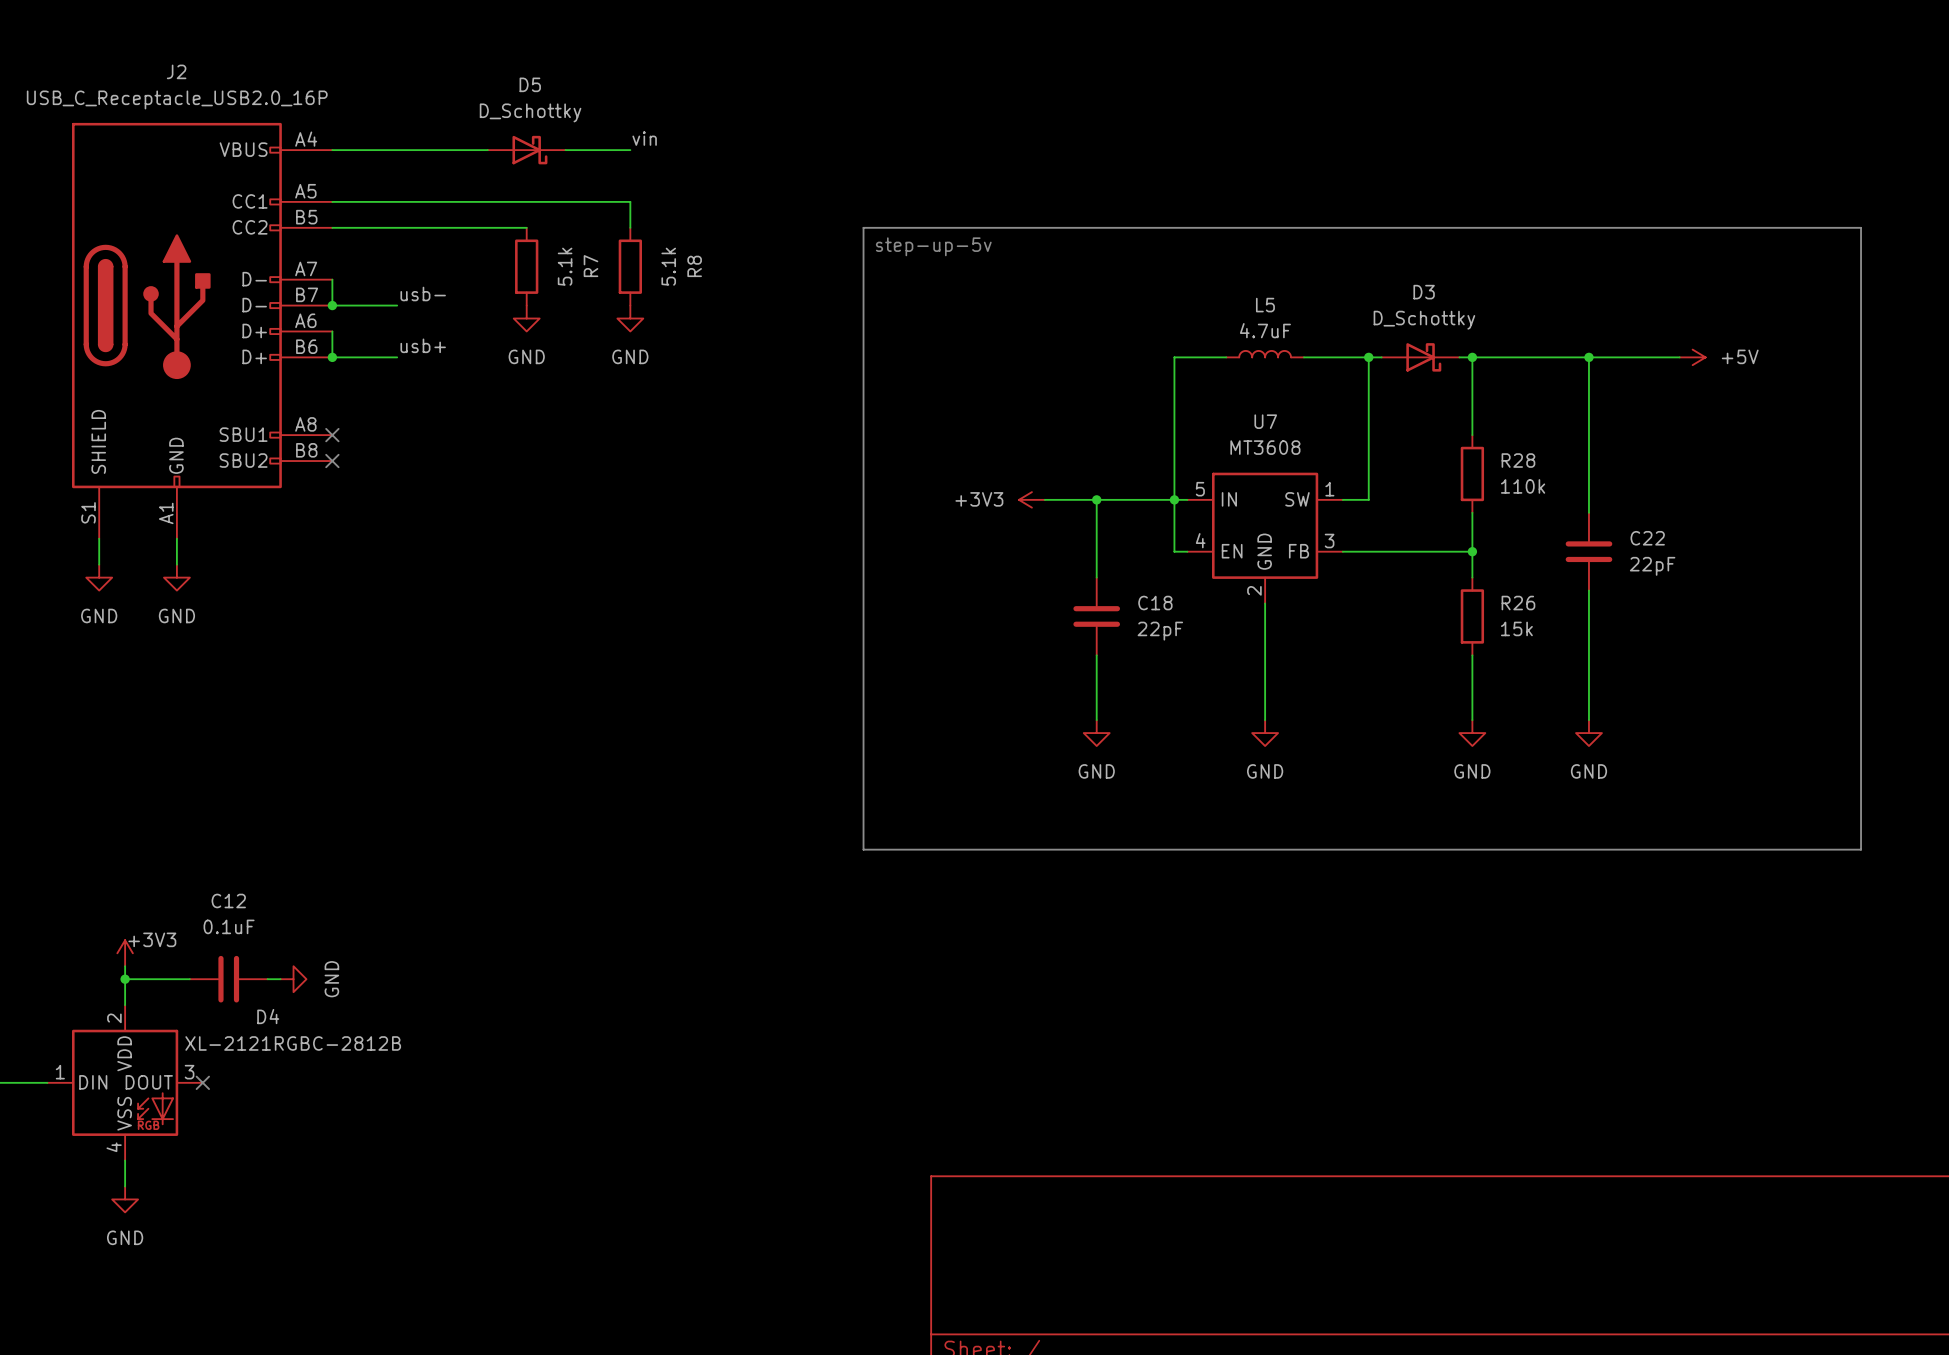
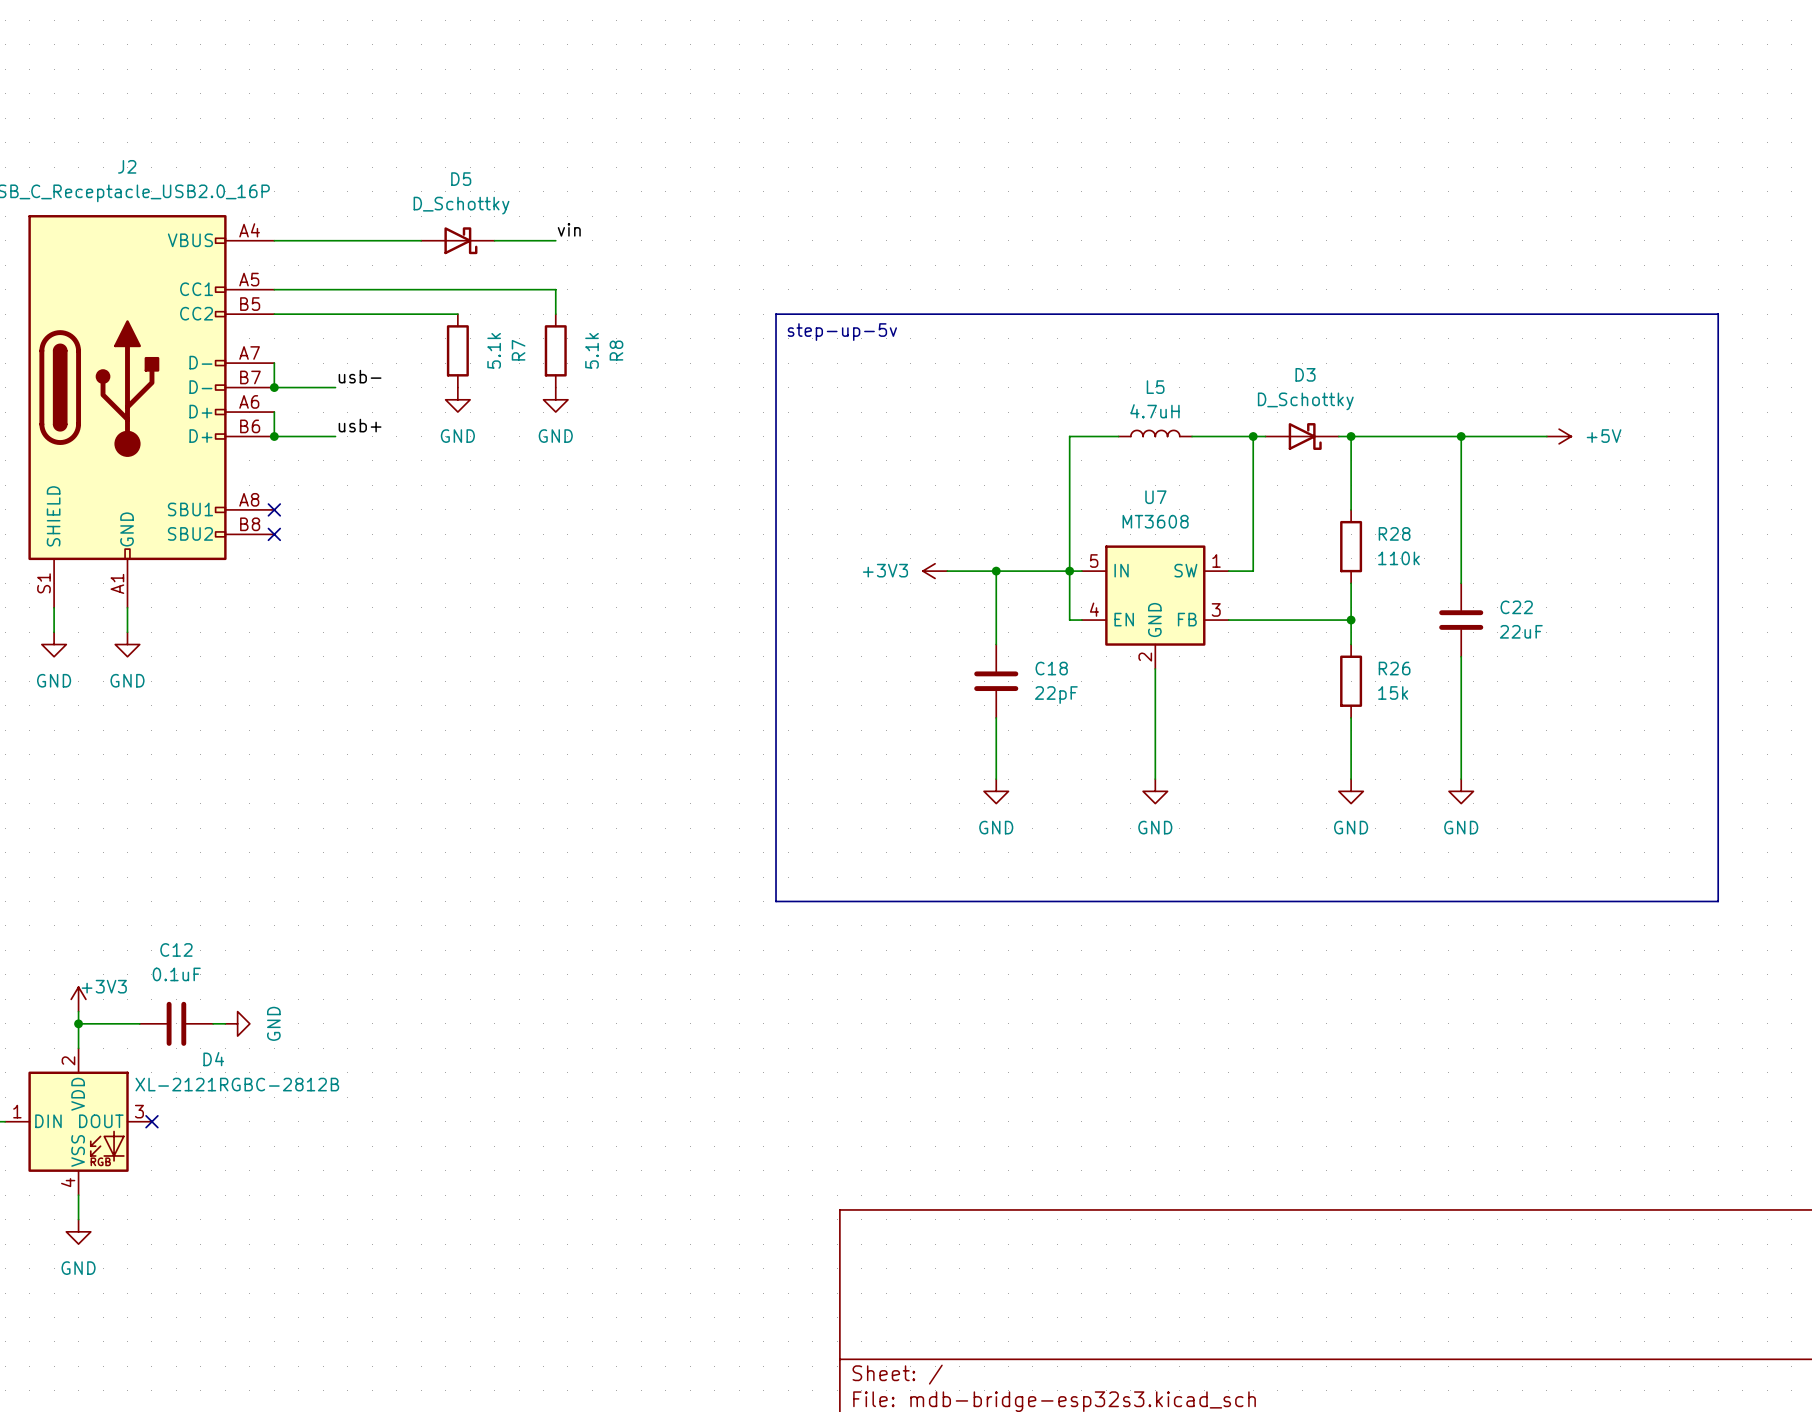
L5 value: 4.7uF (1265, 330) -> 4.7uH (1155, 411)
C22 value: 22pF (1652, 566) -> 22uF (1521, 631)

